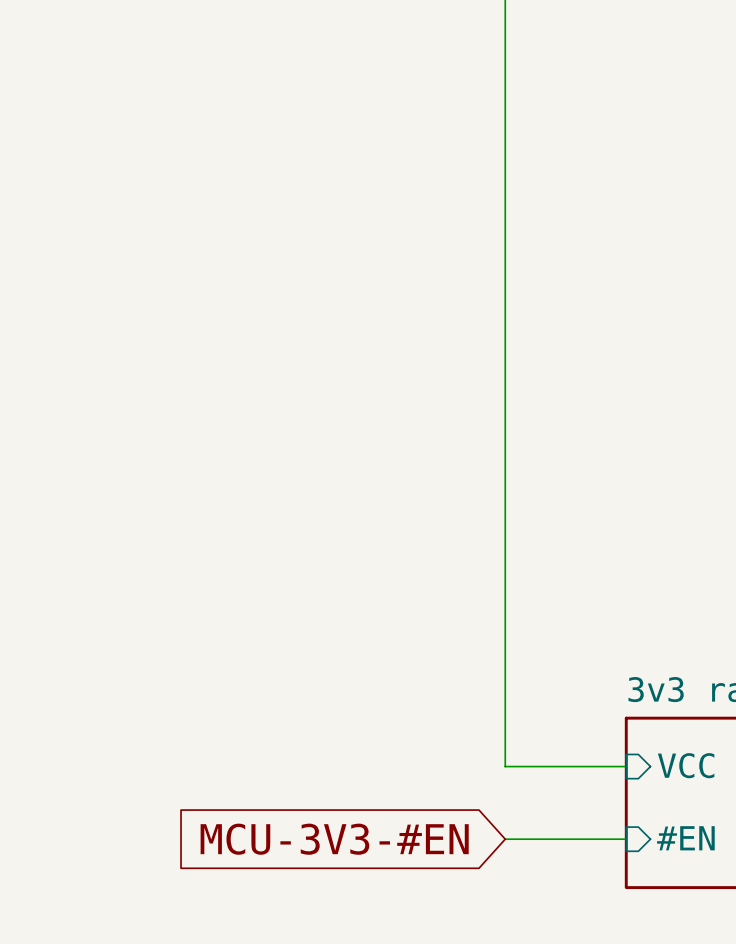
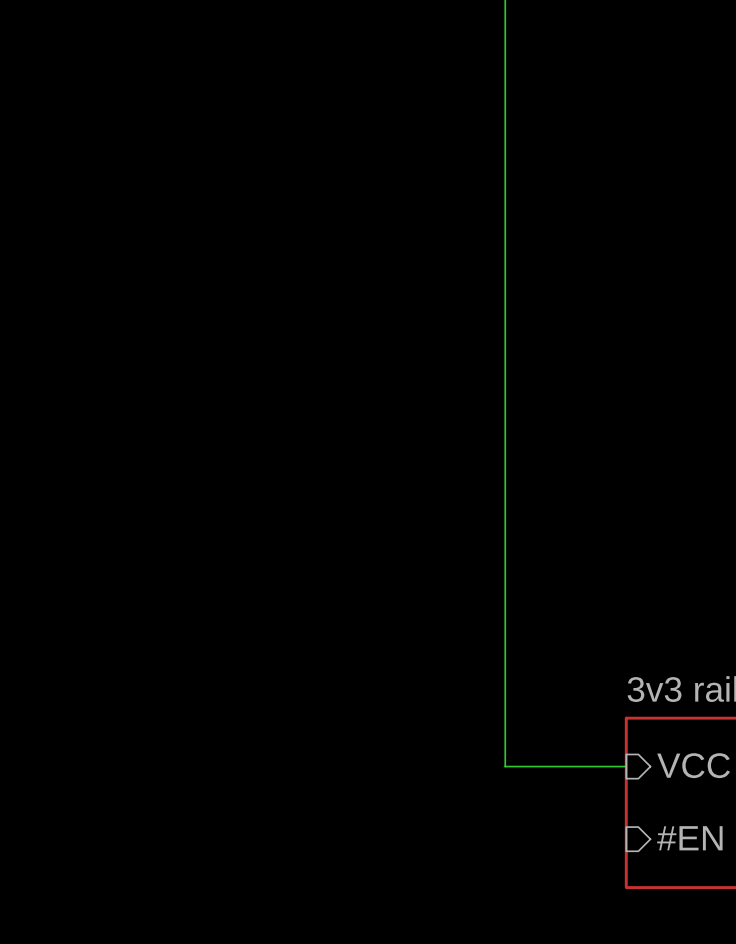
global label: MCU-3V3-#EN (334, 839) -> none
wire: (505, 839) (626, 839) -> none

